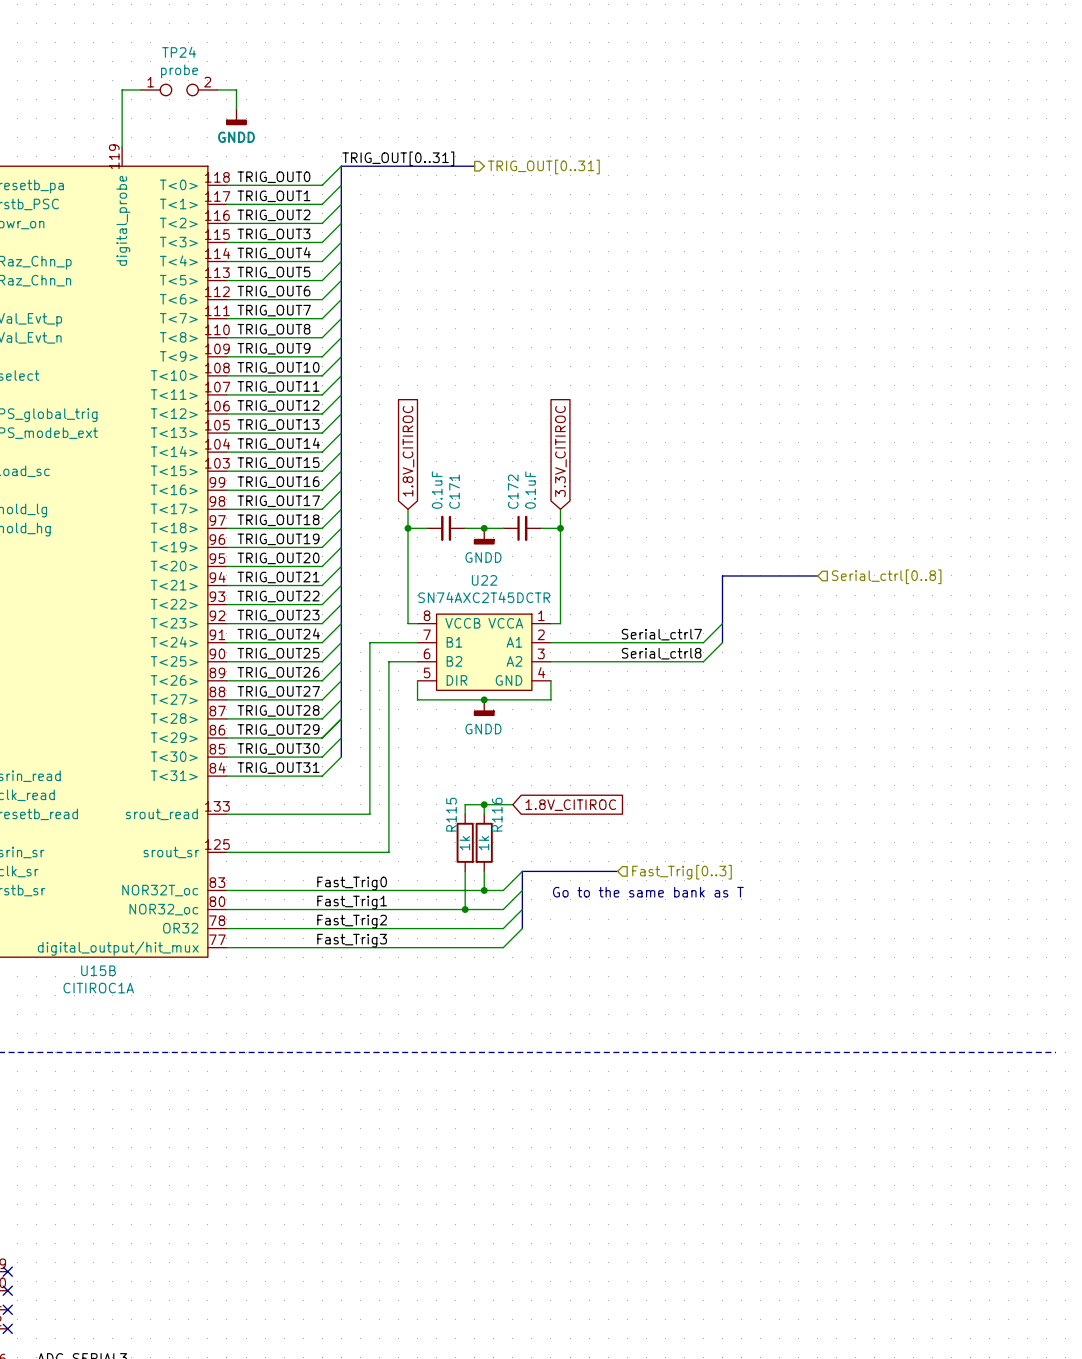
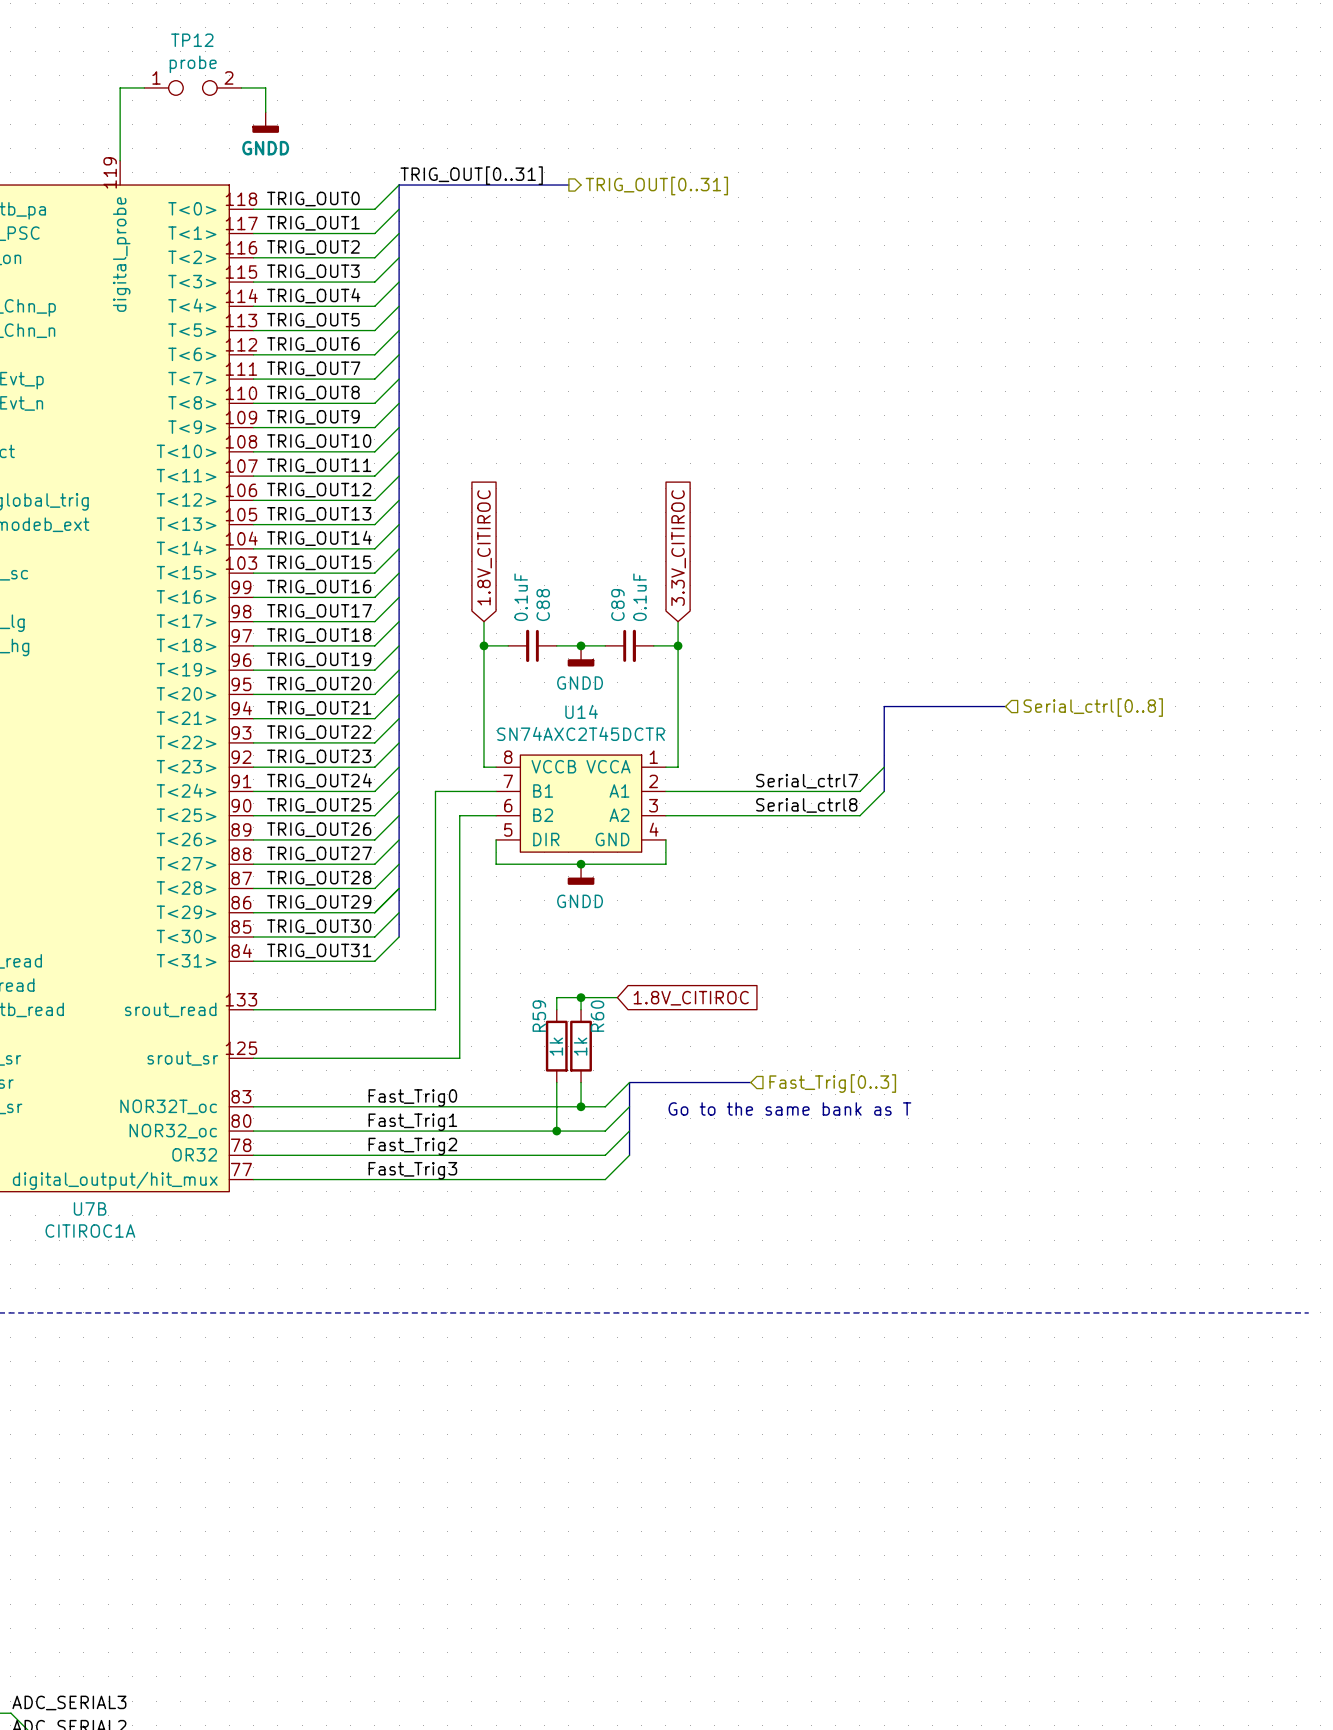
TP24 name: TP24 (179, 52) -> TP12 (192, 40)
C171 name: C171 (454, 491) -> C88 (543, 605)
C172 name: C172 (513, 491) -> C89 (617, 605)
U22 name: U22 (484, 580) -> U14 (581, 711)
R115 name: R115 (451, 814) -> R59 (539, 1016)
R116 name: R116 (497, 814) -> R60 (597, 1016)
U15B name: U15B (98, 970) -> U7B (90, 1208)

